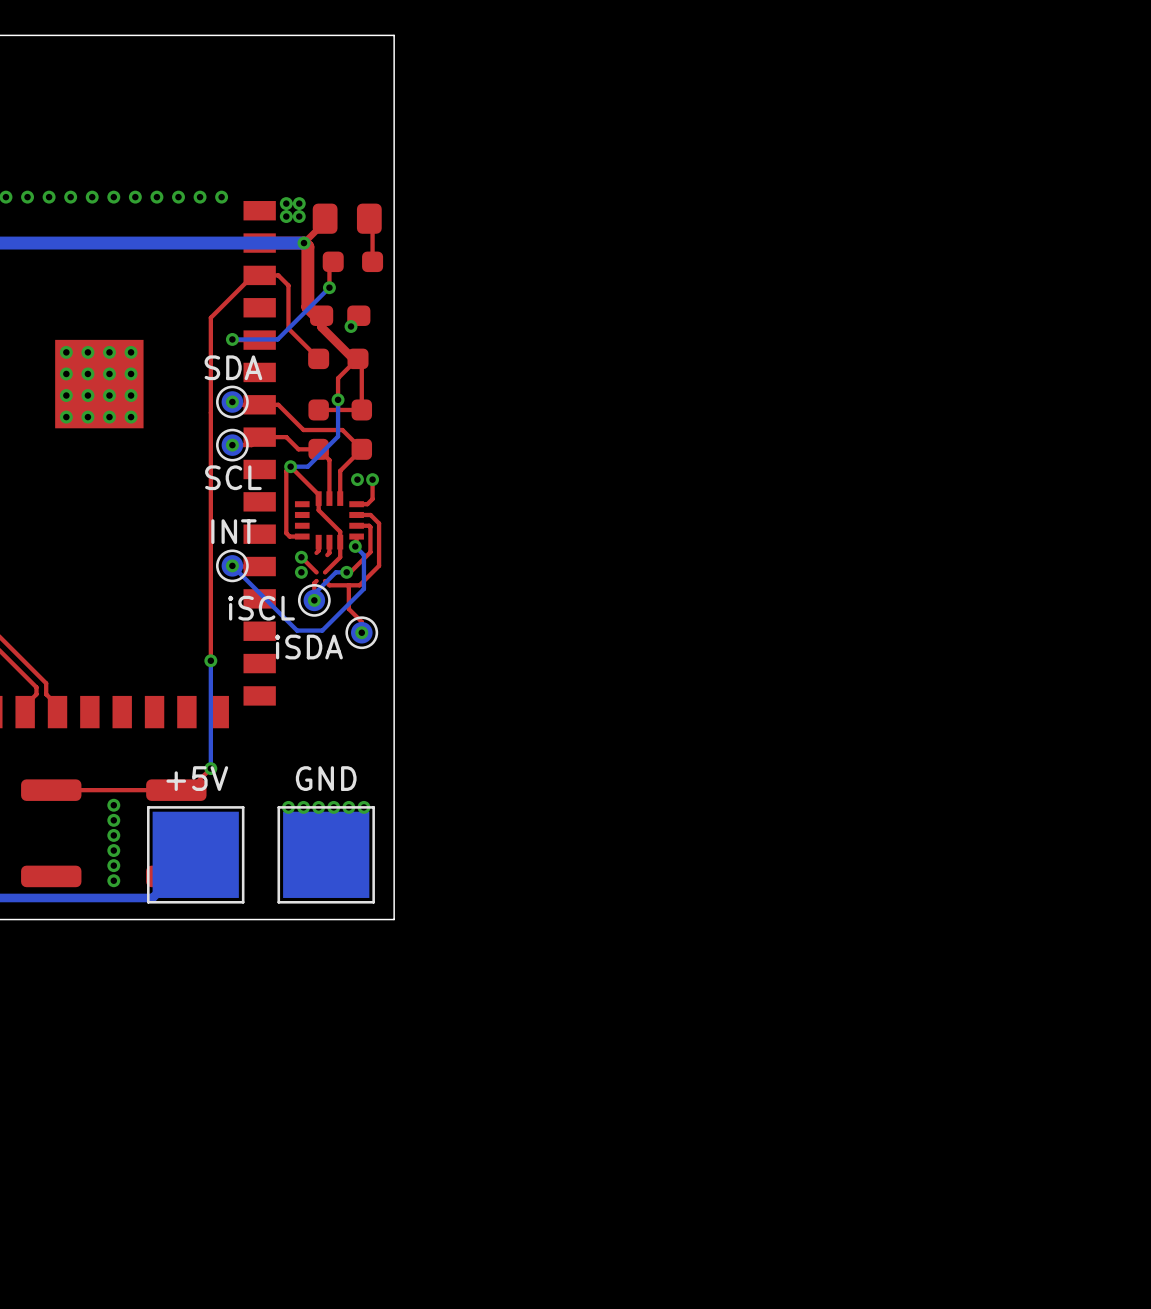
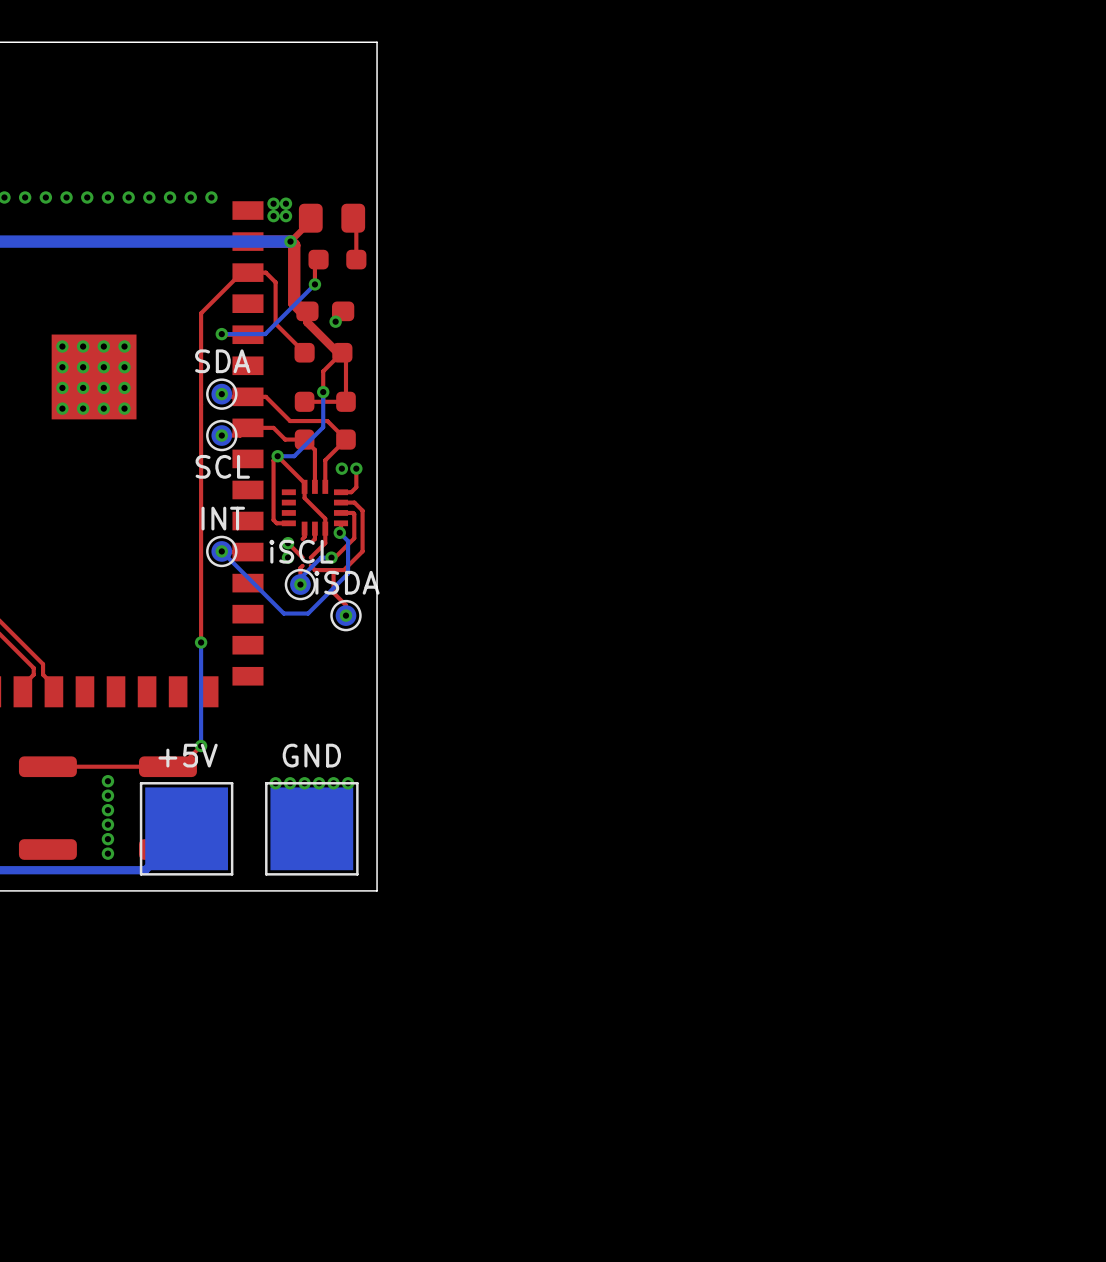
part value position: iSCL (261, 608) -> iSCL (301, 551)
part value position: iSDA (308, 647) -> iSDA (346, 582)

